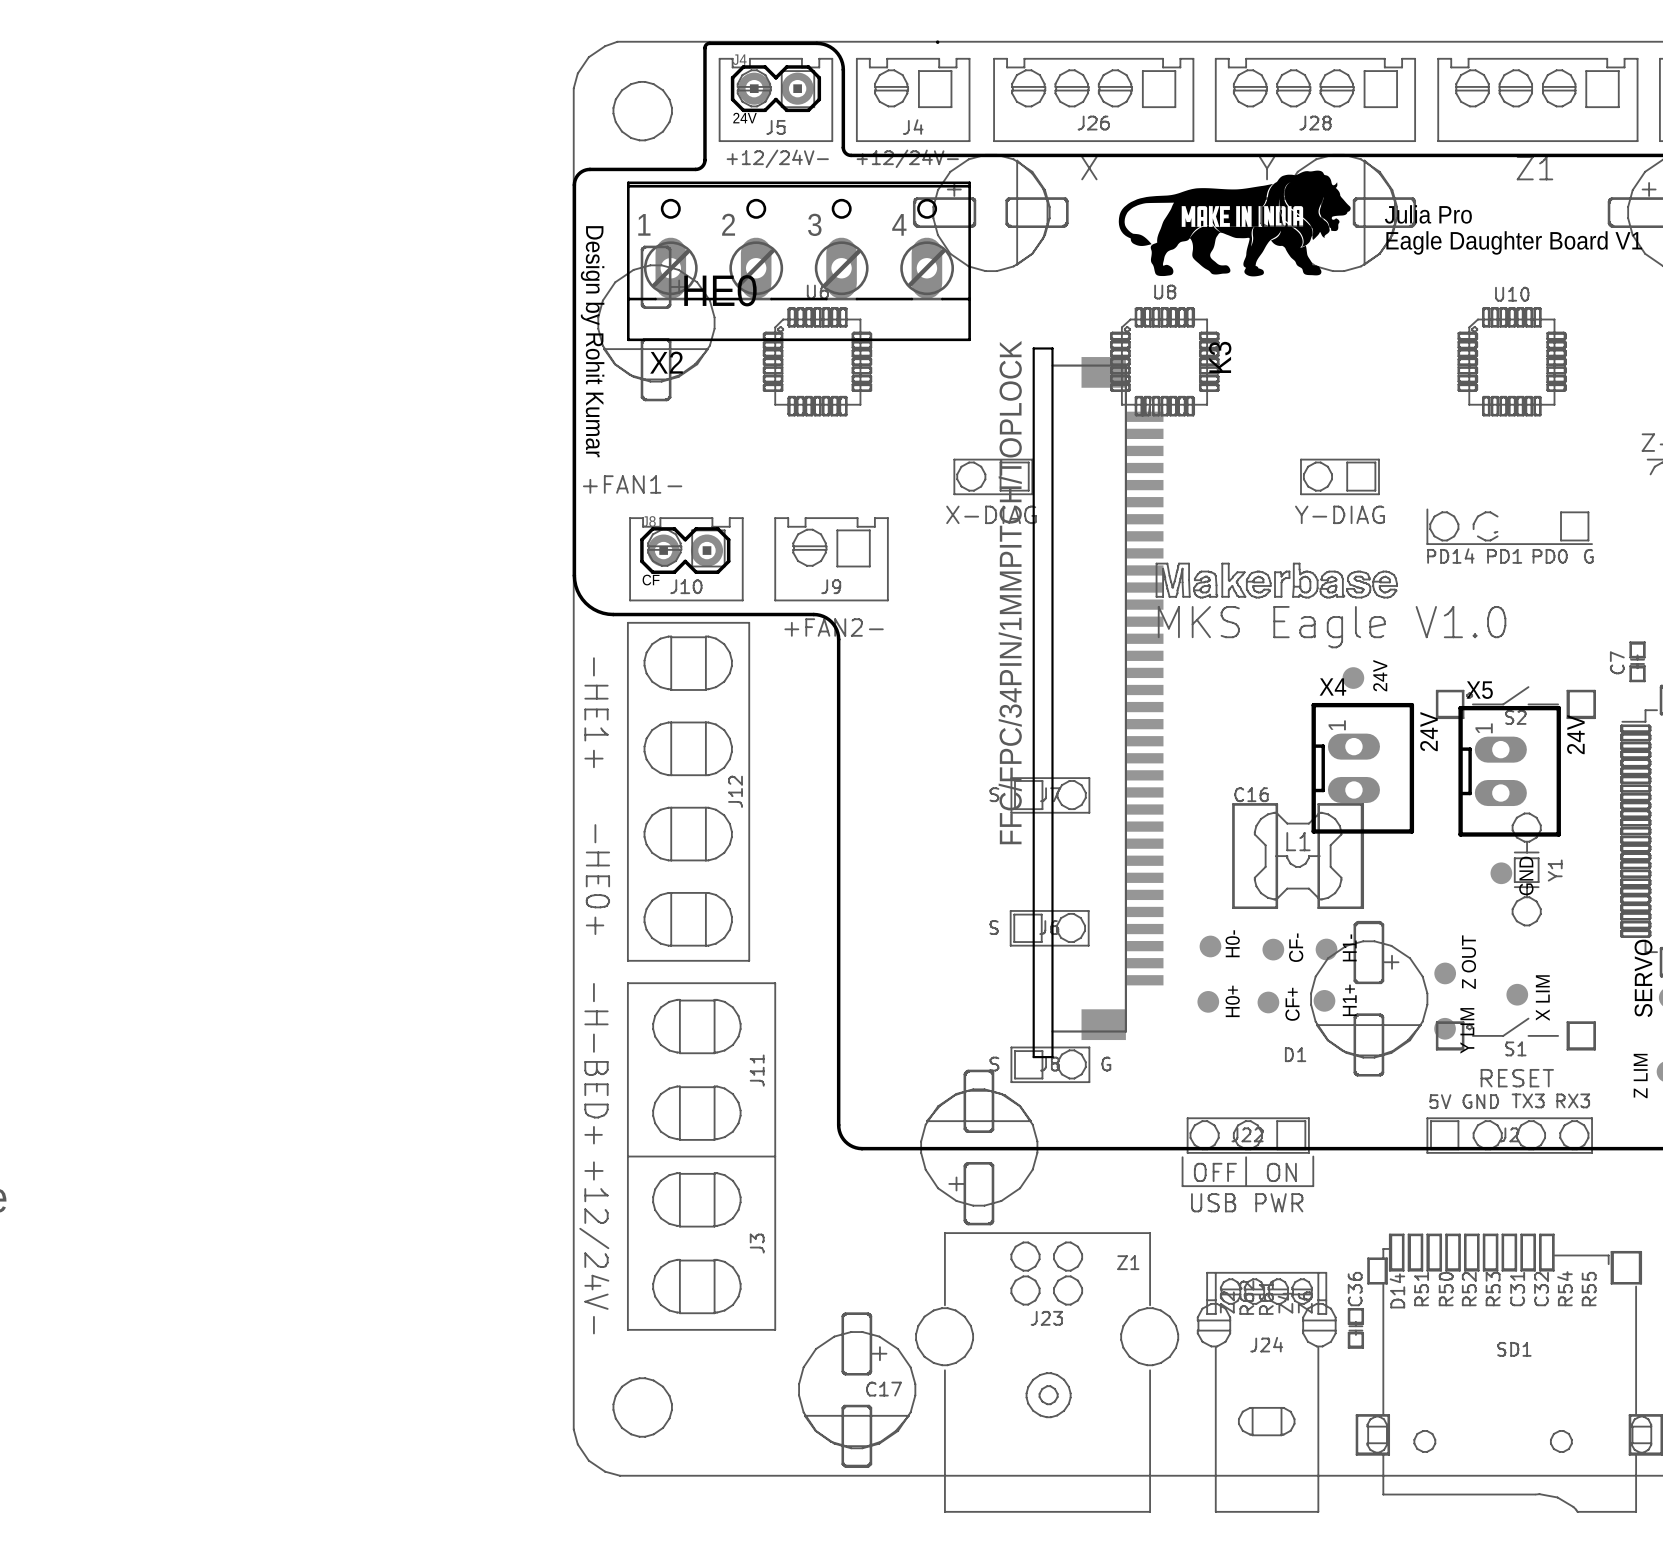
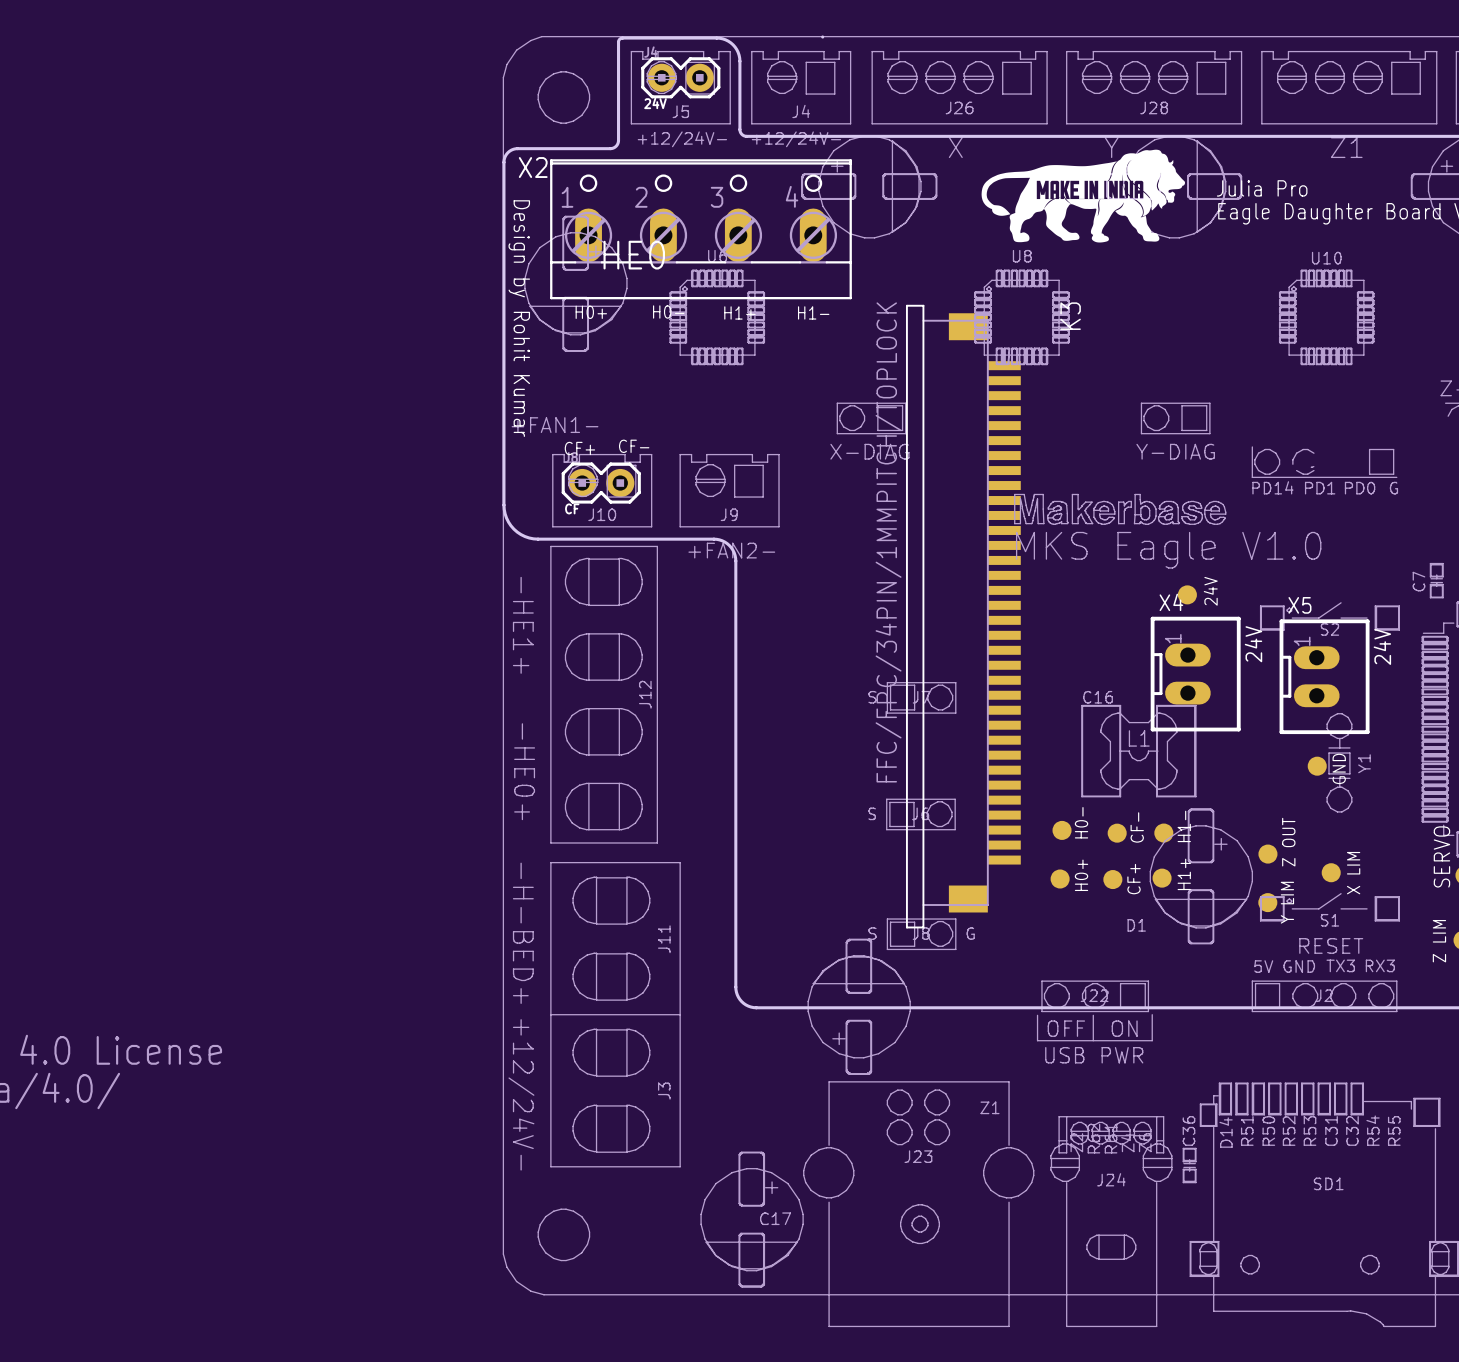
text: none -> H0+ (591, 312)
text: none -> H0- (668, 311)
text: none -> H1+ (739, 312)
text: none -> H1- (813, 312)
X2 name position: X2 (666, 362) -> X2 (533, 167)
text: none -> CF- (634, 446)
text: none -> CF+ (579, 448)

